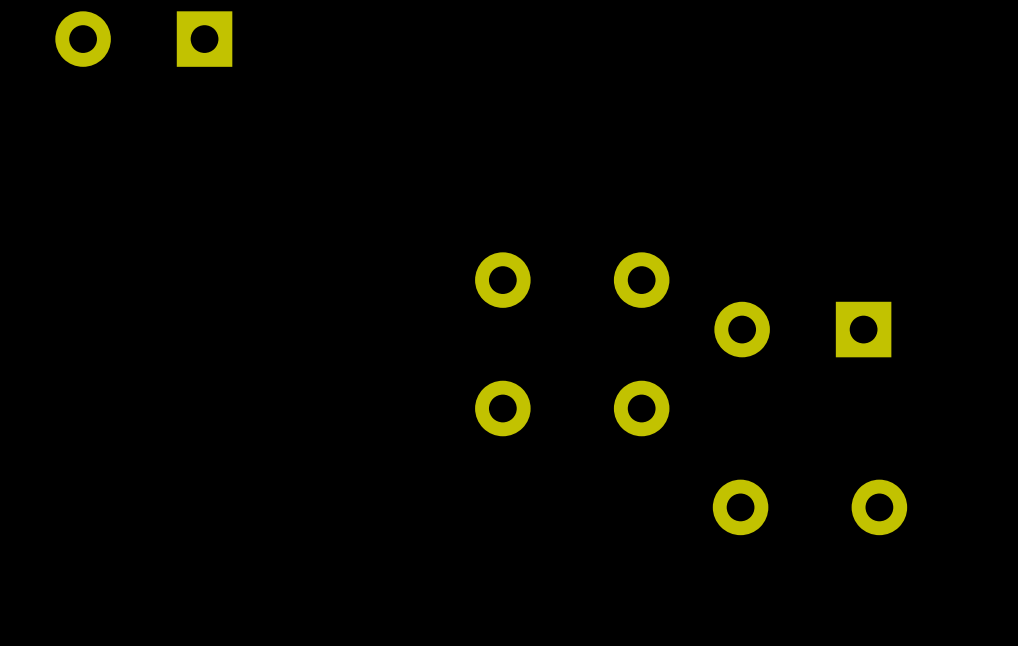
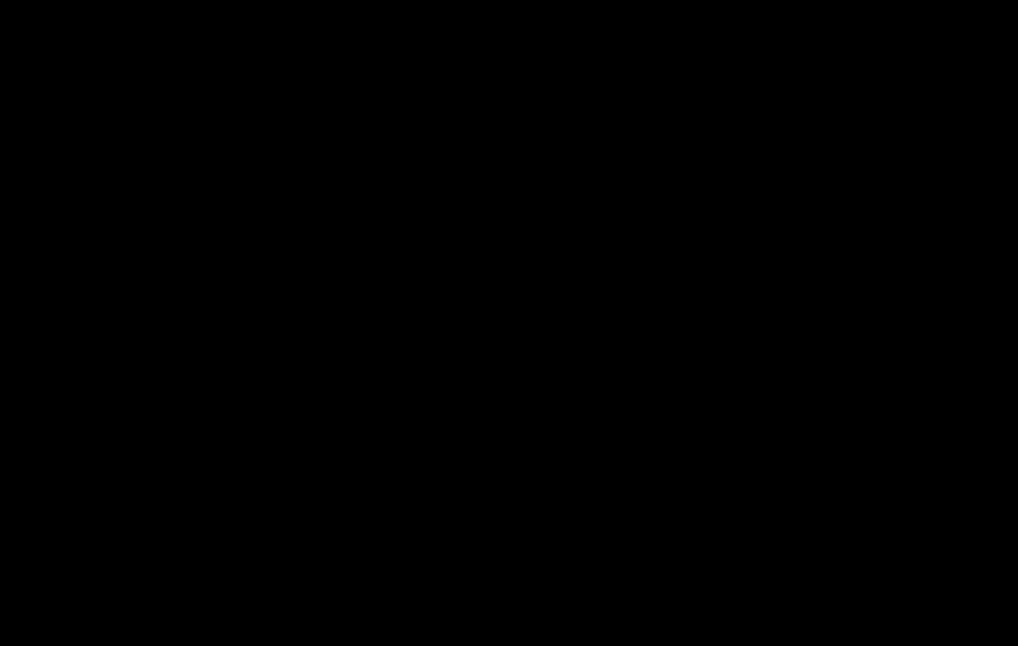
part: (143, 39) -> none
part: (572, 280) -> none
part: (802, 329) -> none
part: (572, 408) -> none
part: (809, 507) -> none

